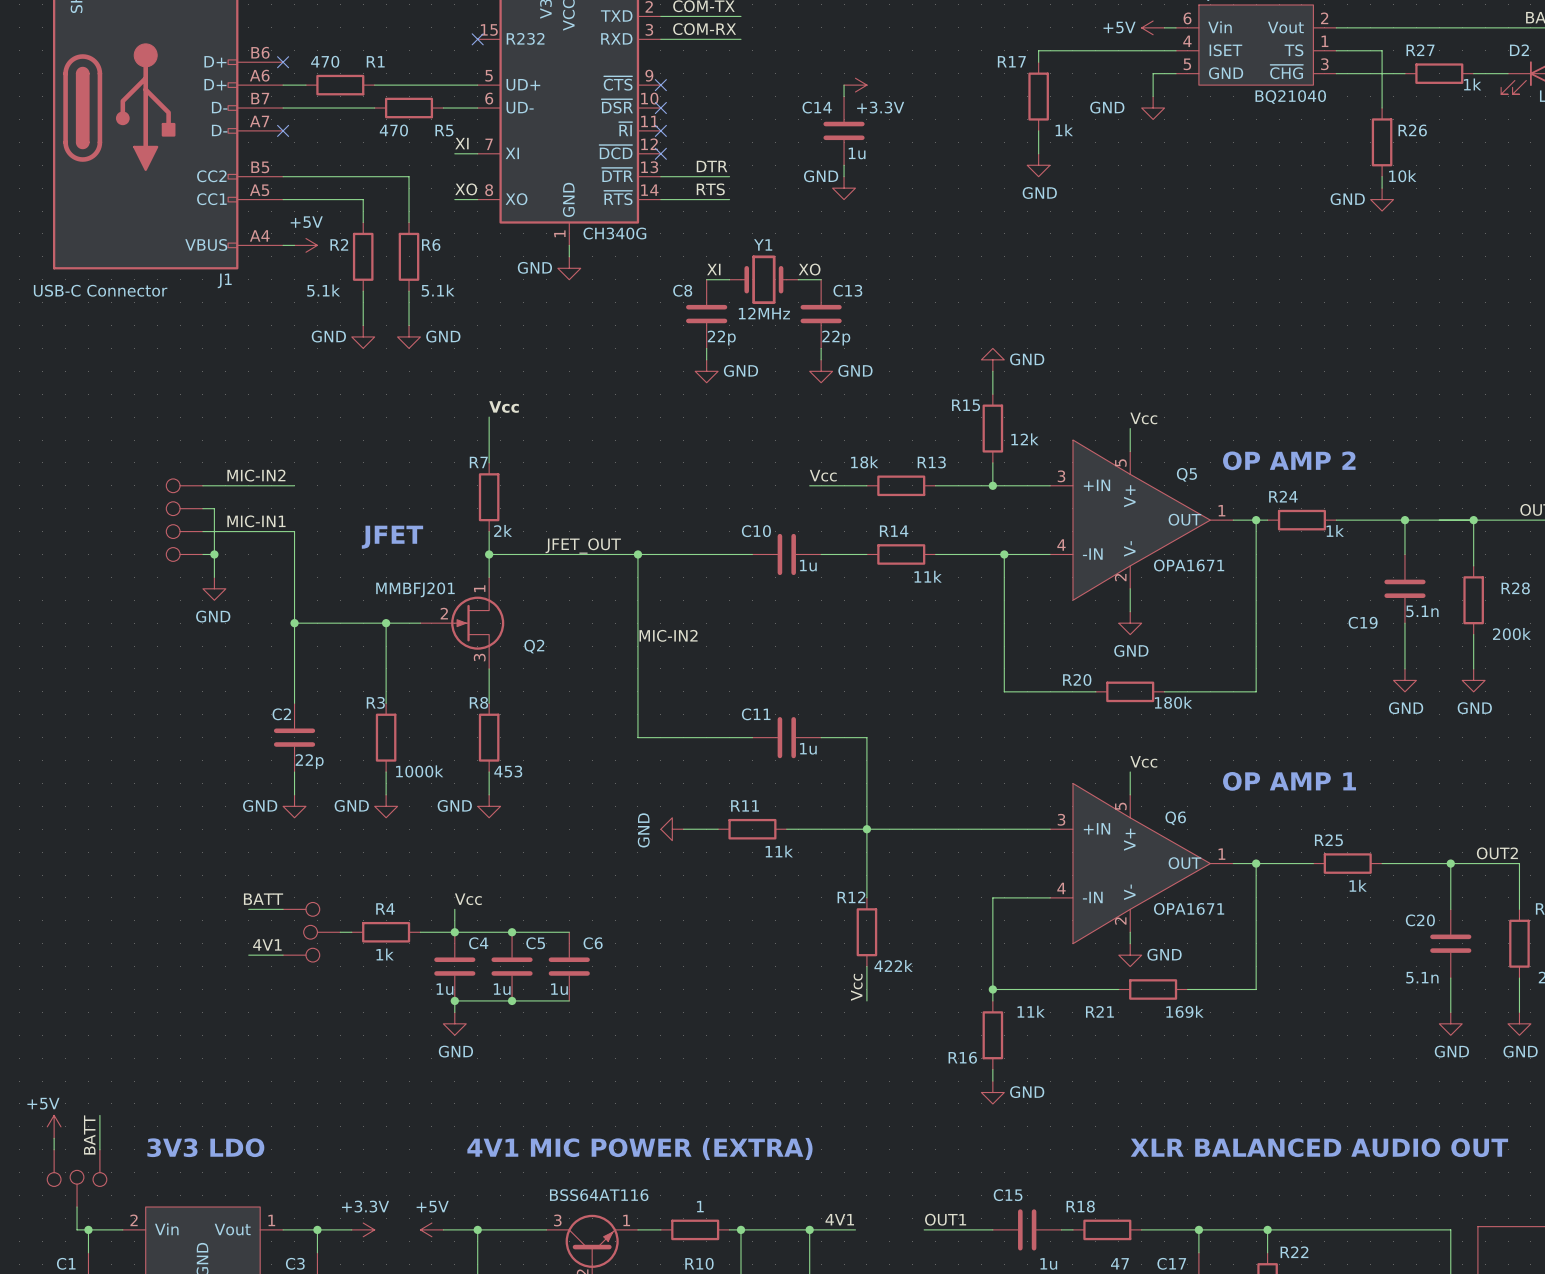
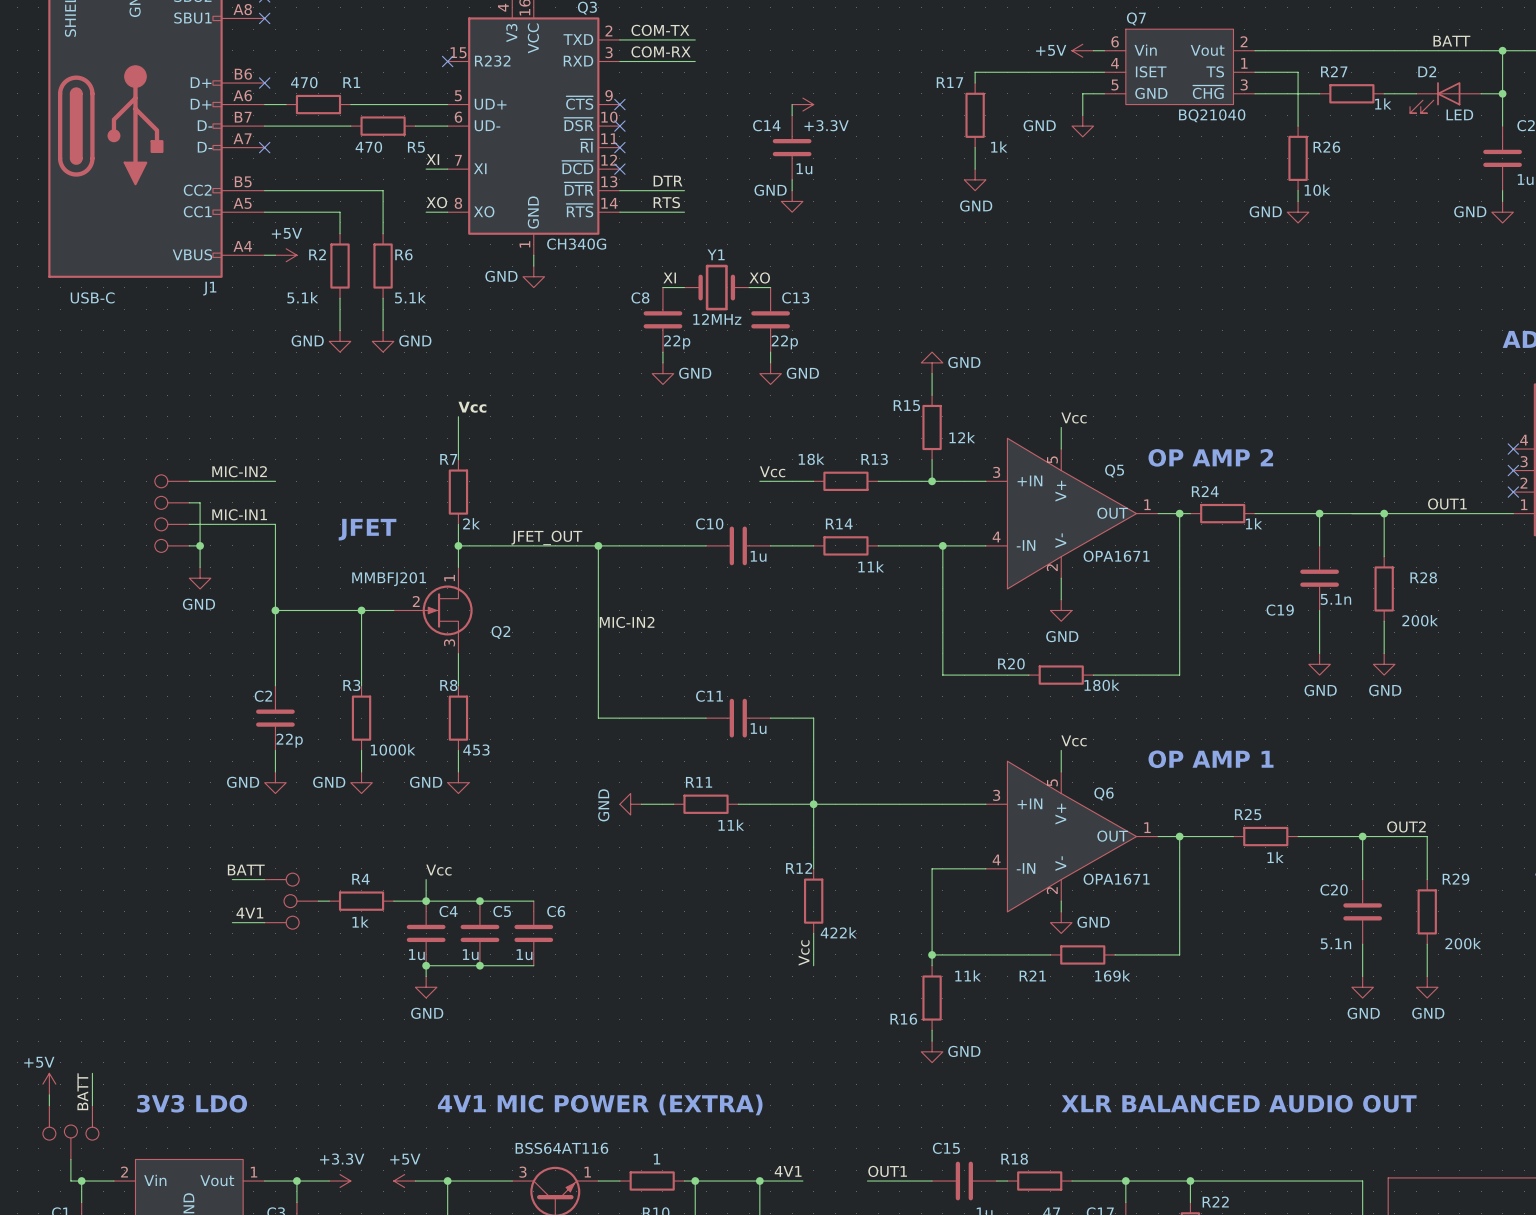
J1 value: USB-C Connector (100, 290) -> USB-C (92, 297)

